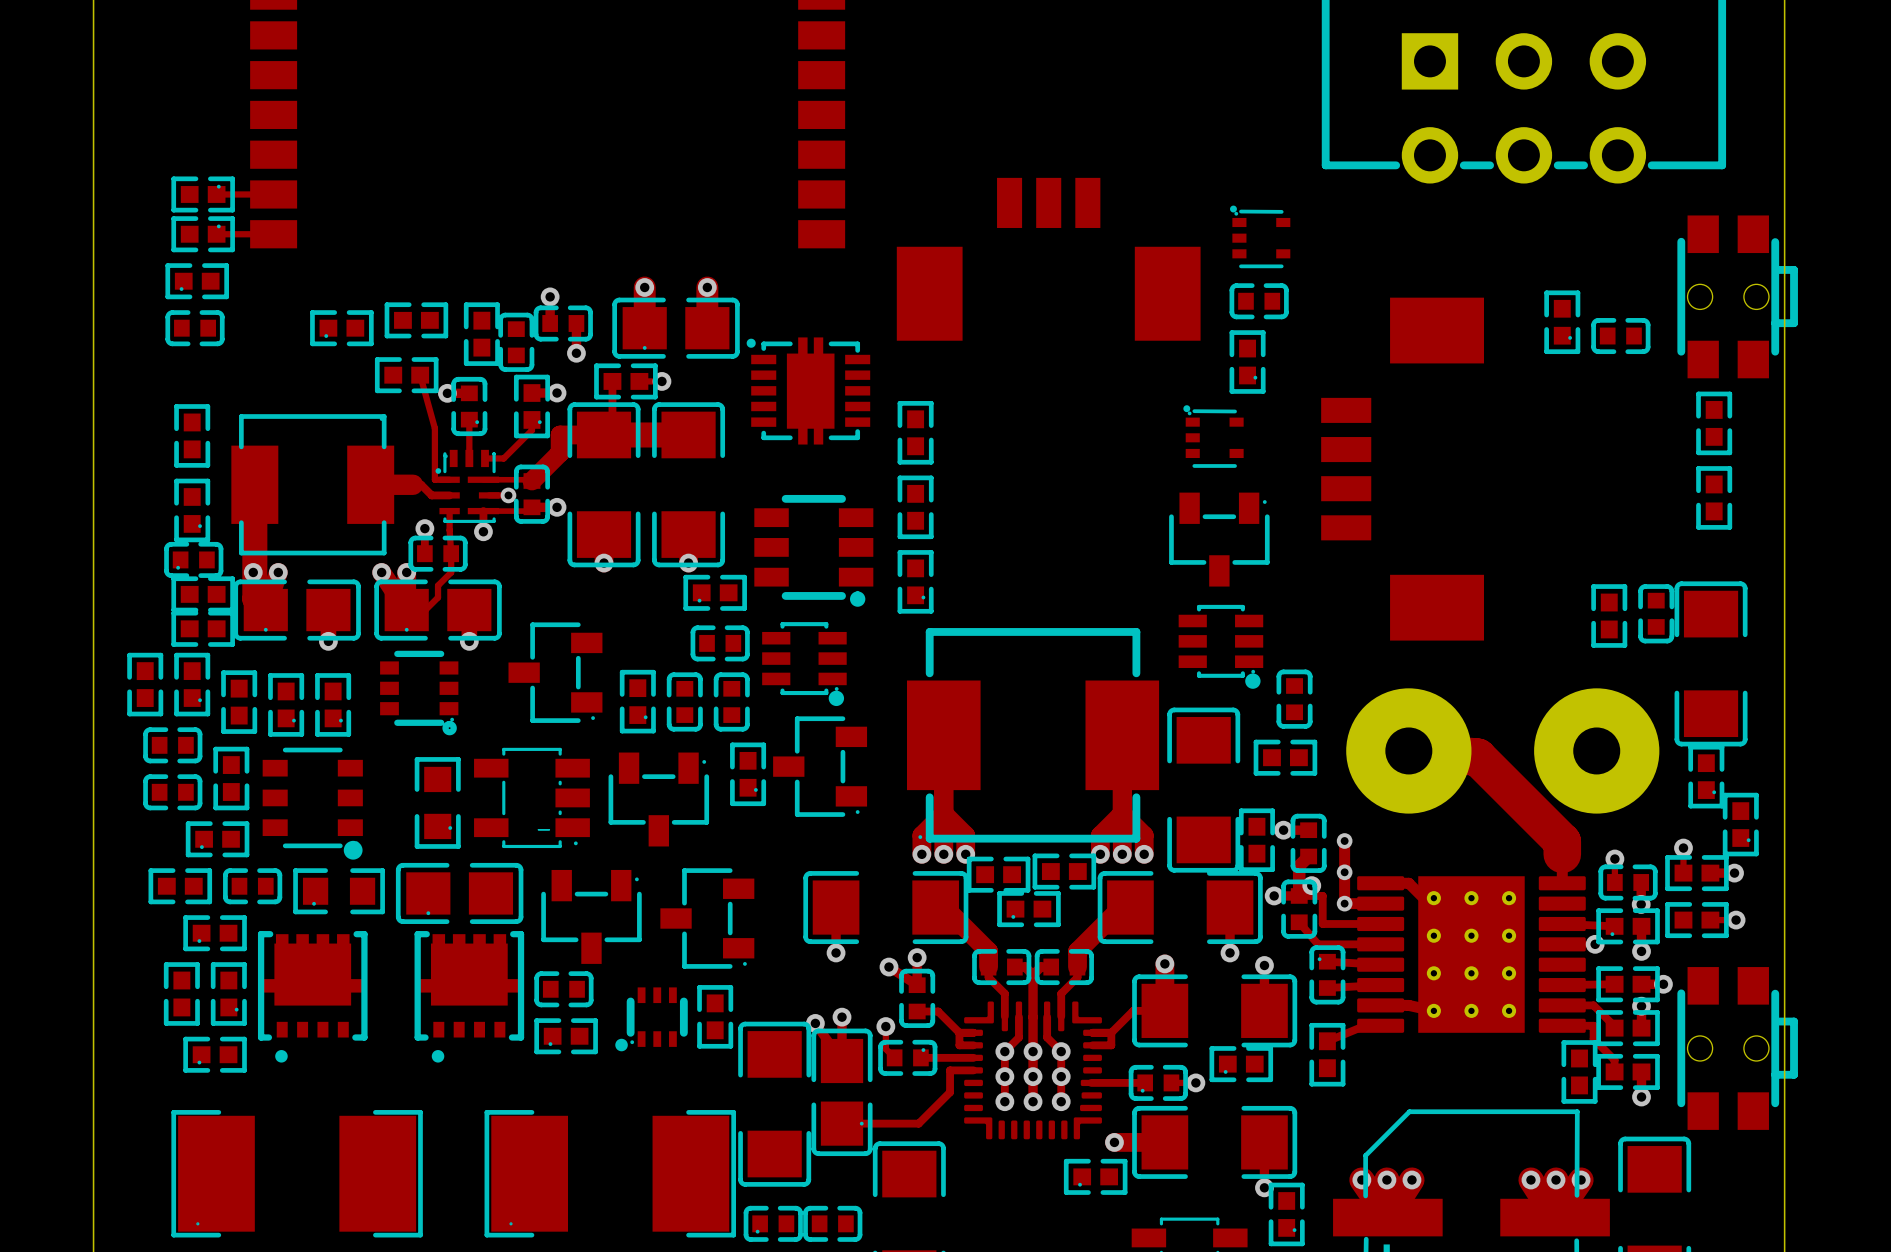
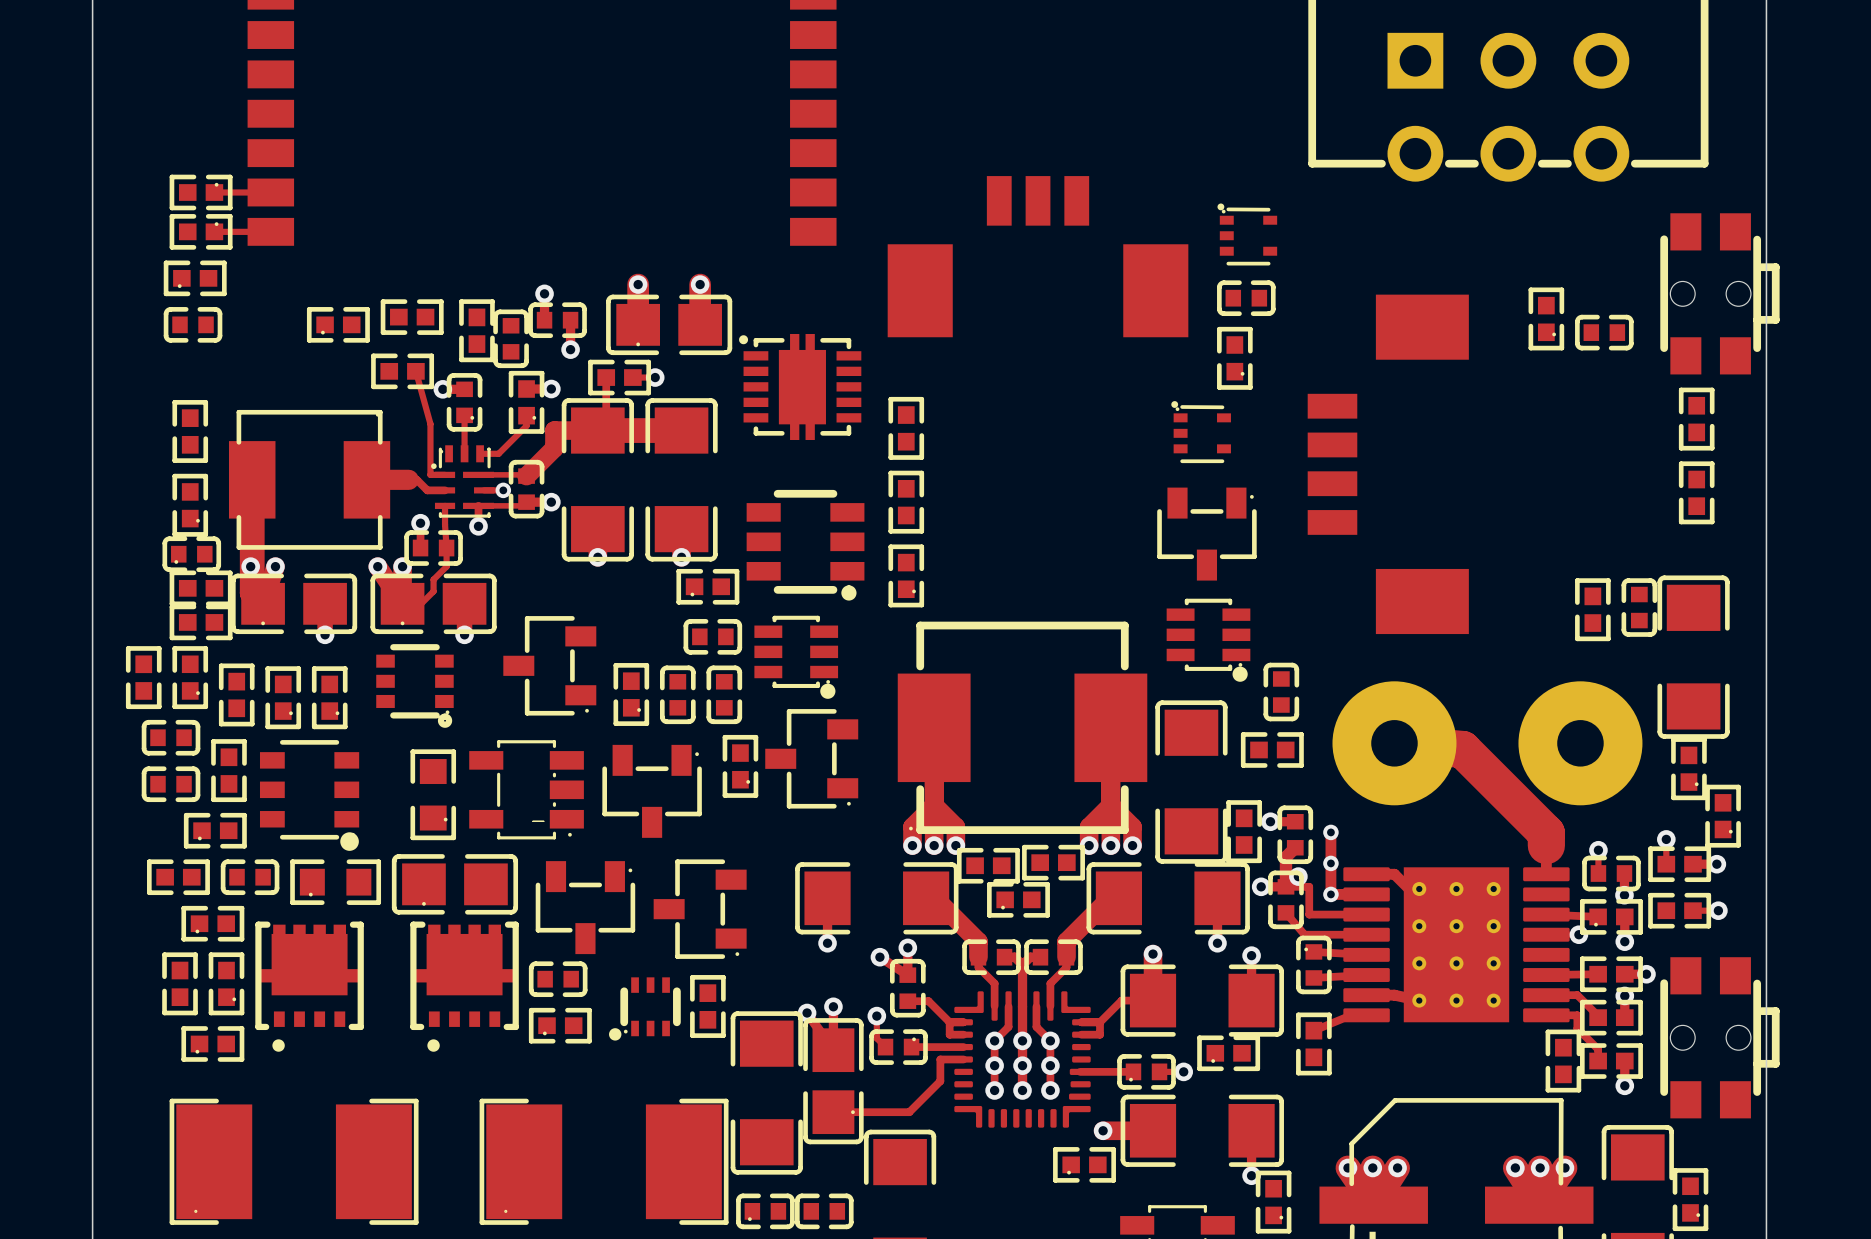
part: none -> (1690, 1199)

